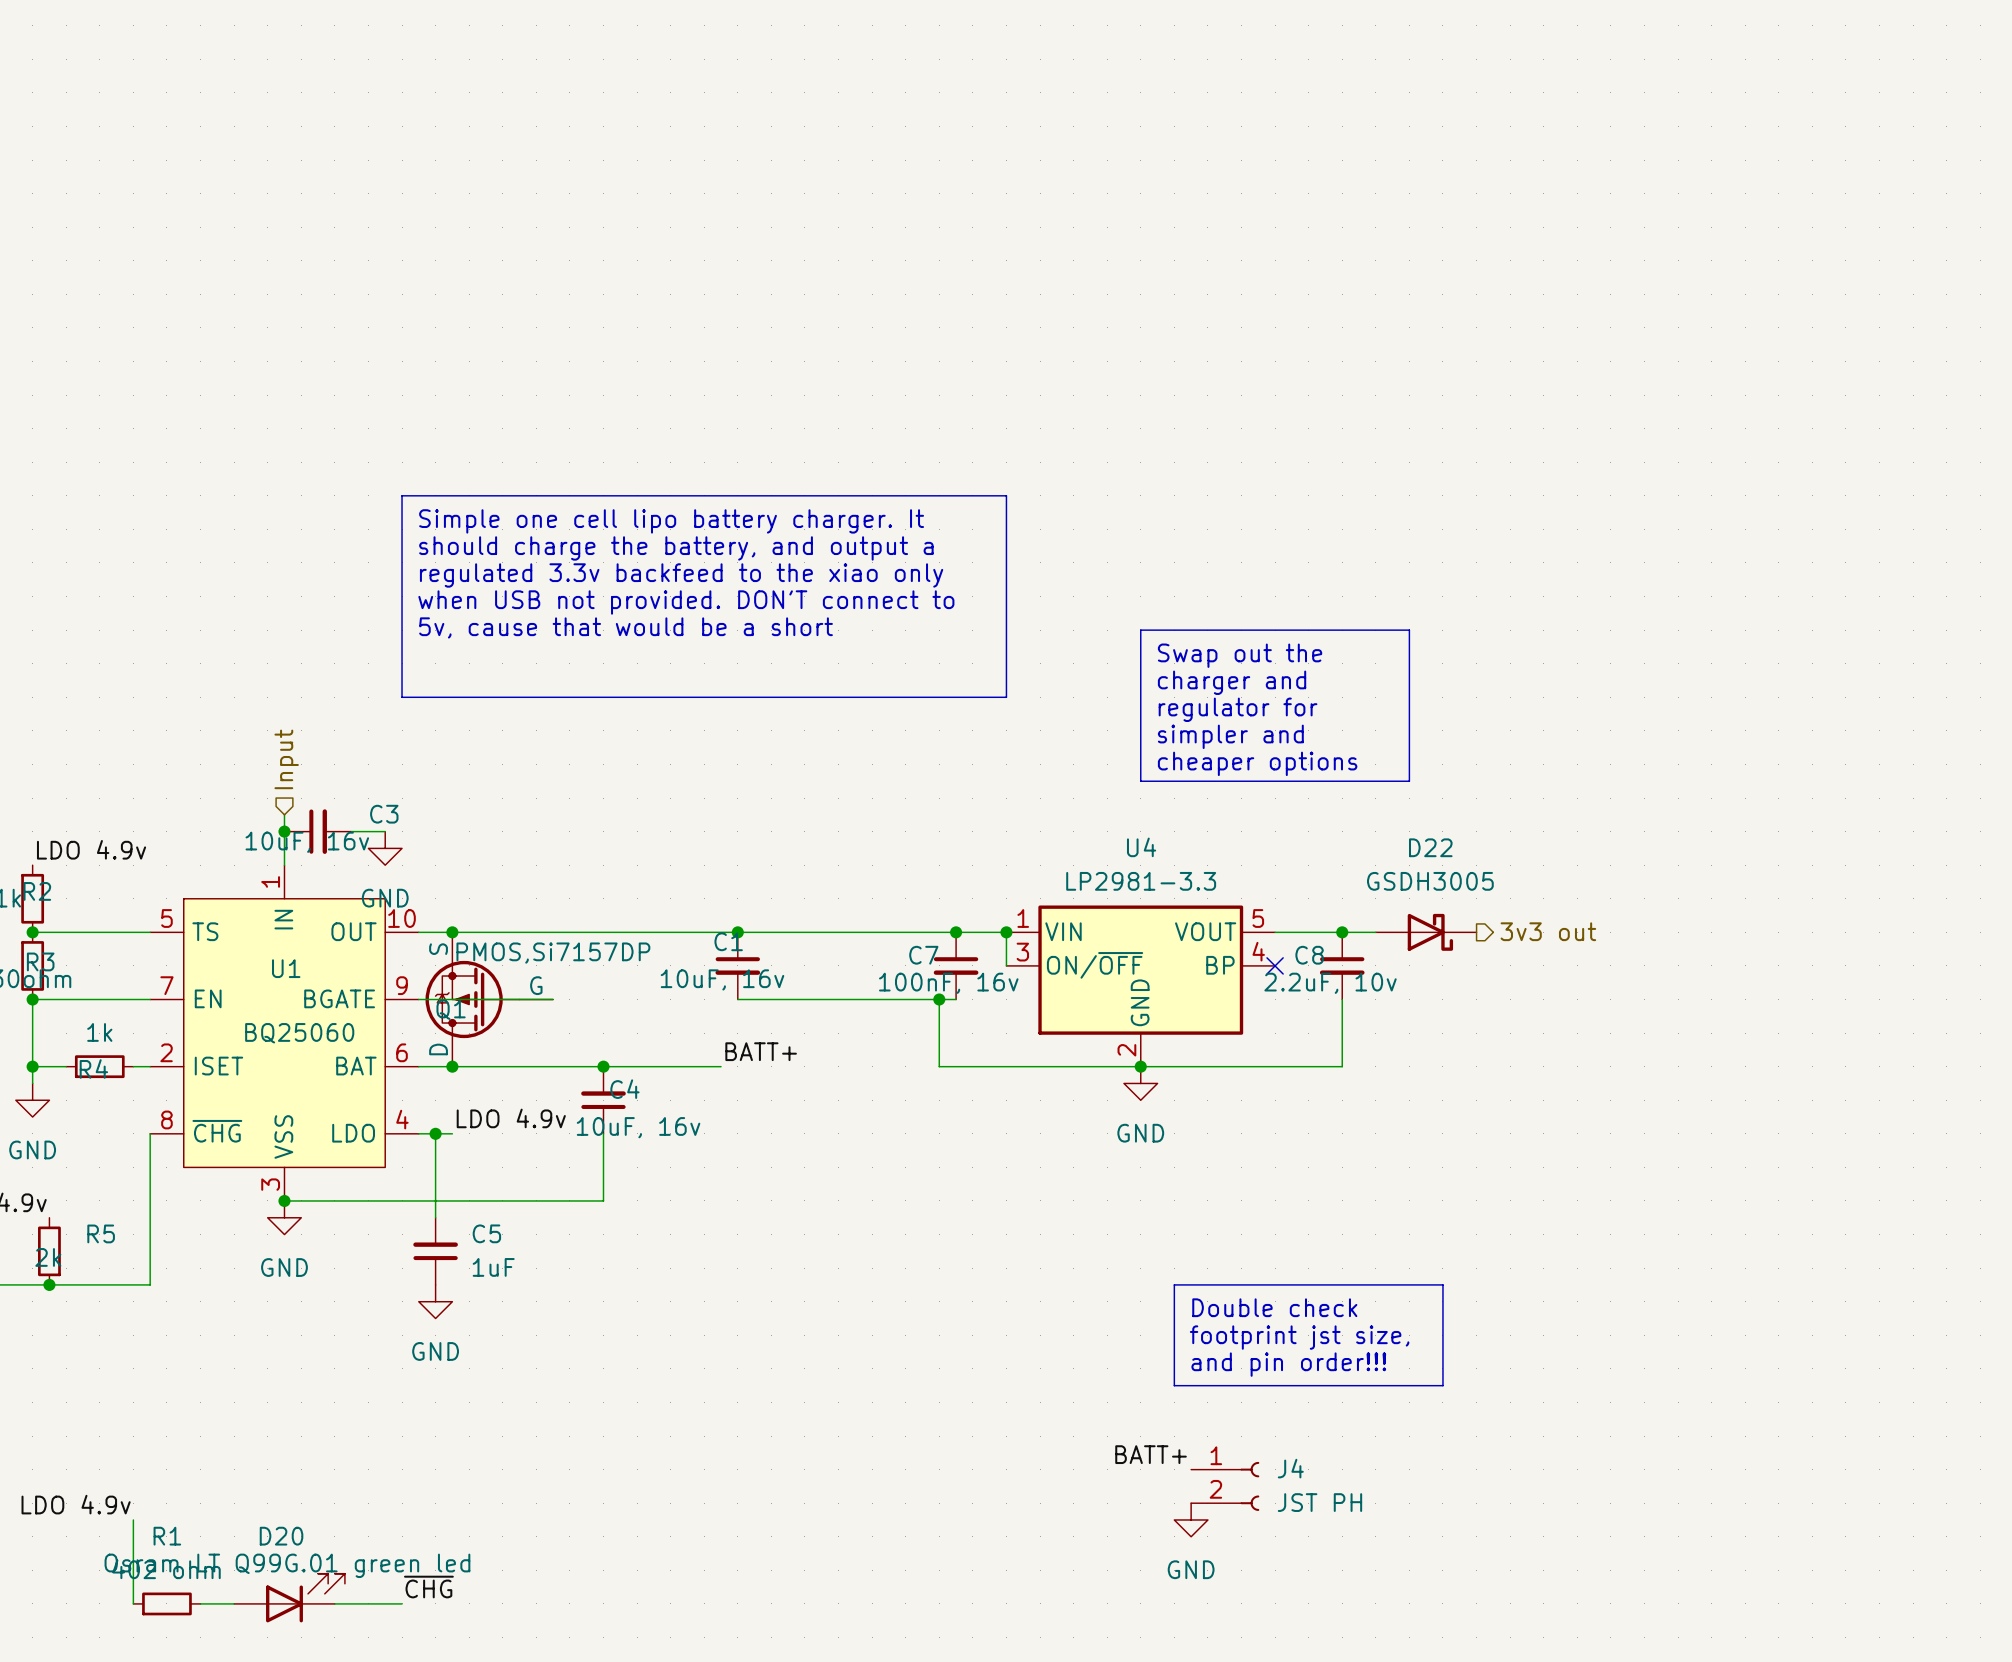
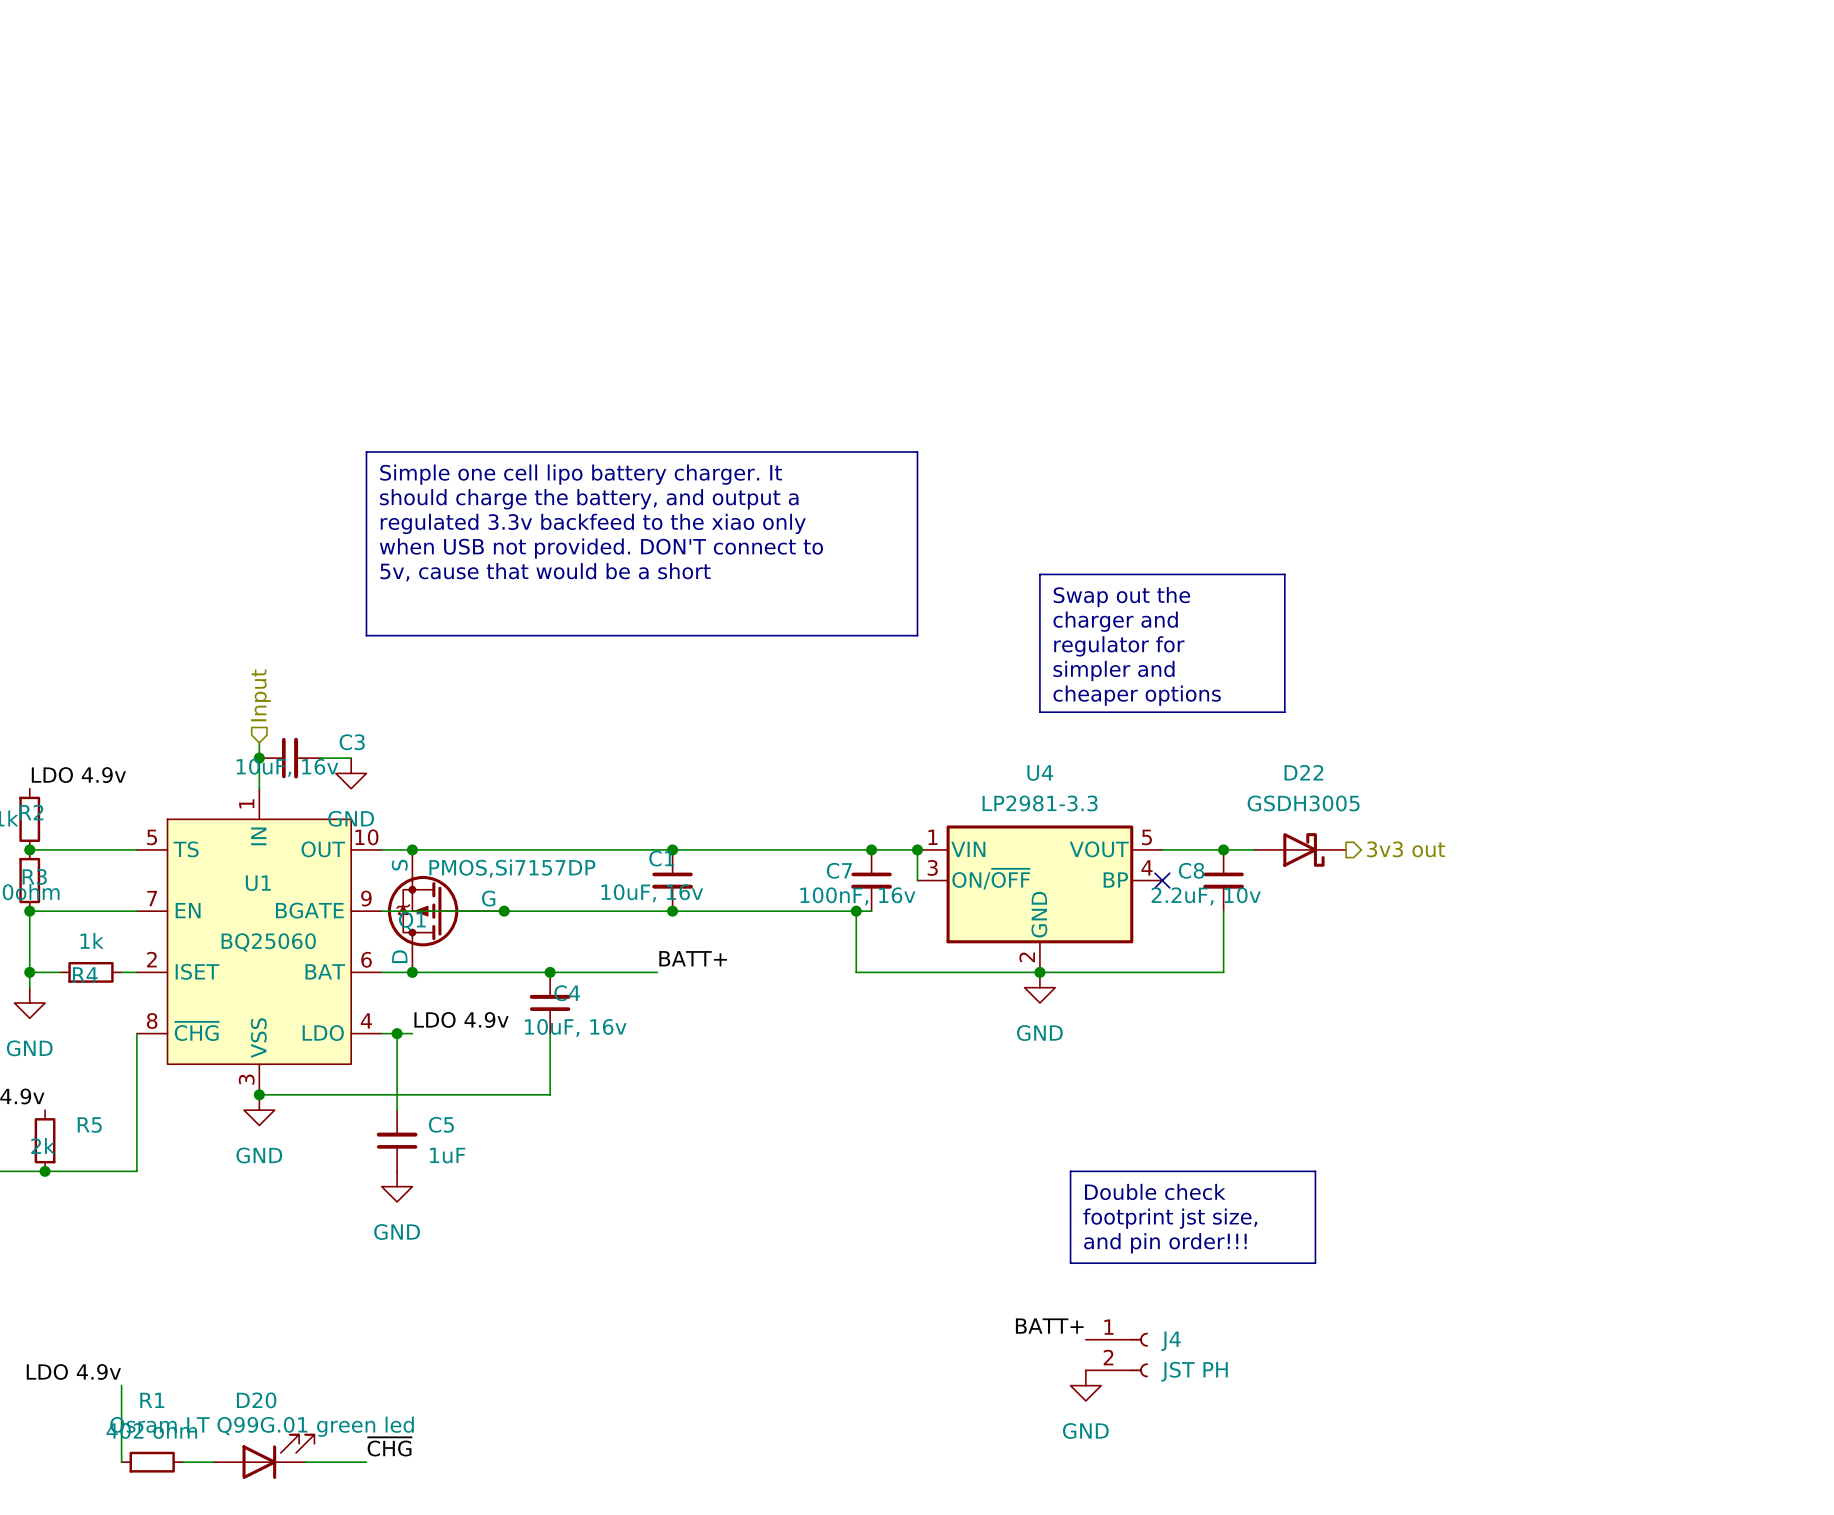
wire: none -> (504, 911) (672, 911)
junction: none -> (504, 911)
junction: none -> (672, 911)

